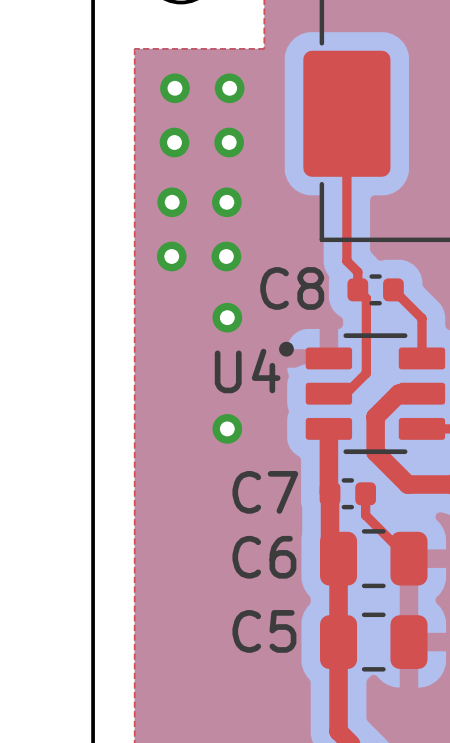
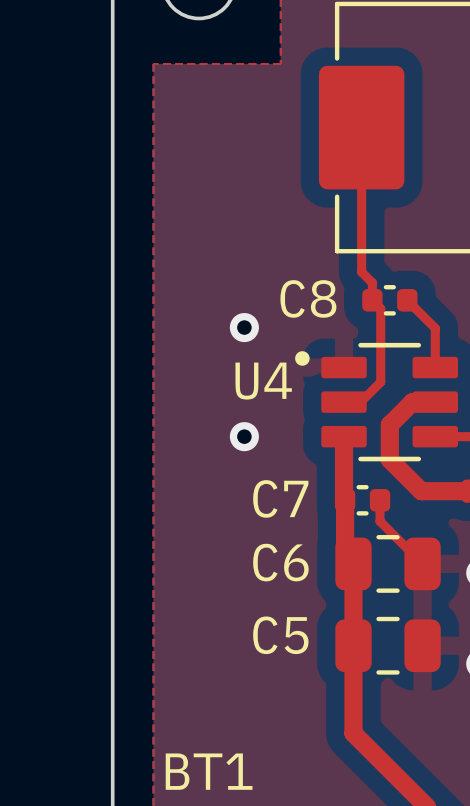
via: (174, 88) -> none
via: (229, 88) -> none
via: (174, 142) -> none
via: (229, 142) -> none
via: (172, 202) -> none
via: (226, 202) -> none
via: (171, 256) -> none
via: (226, 256) -> none

